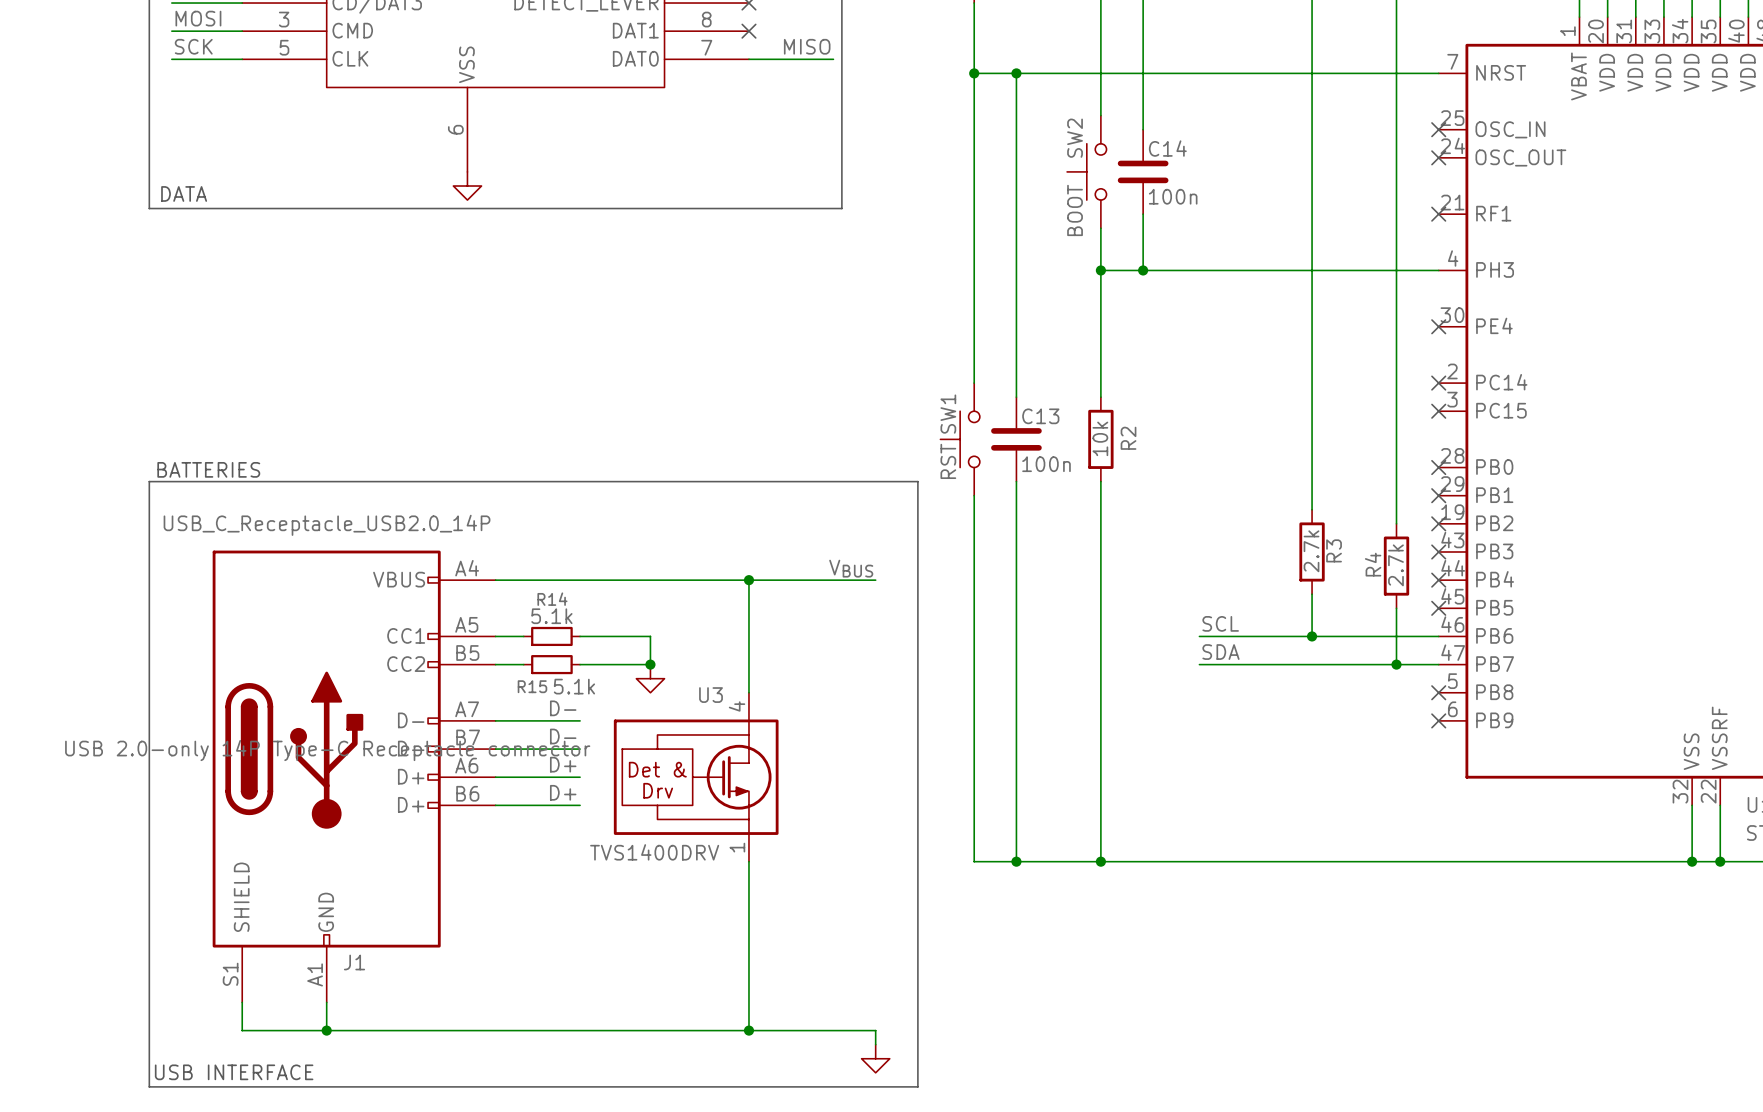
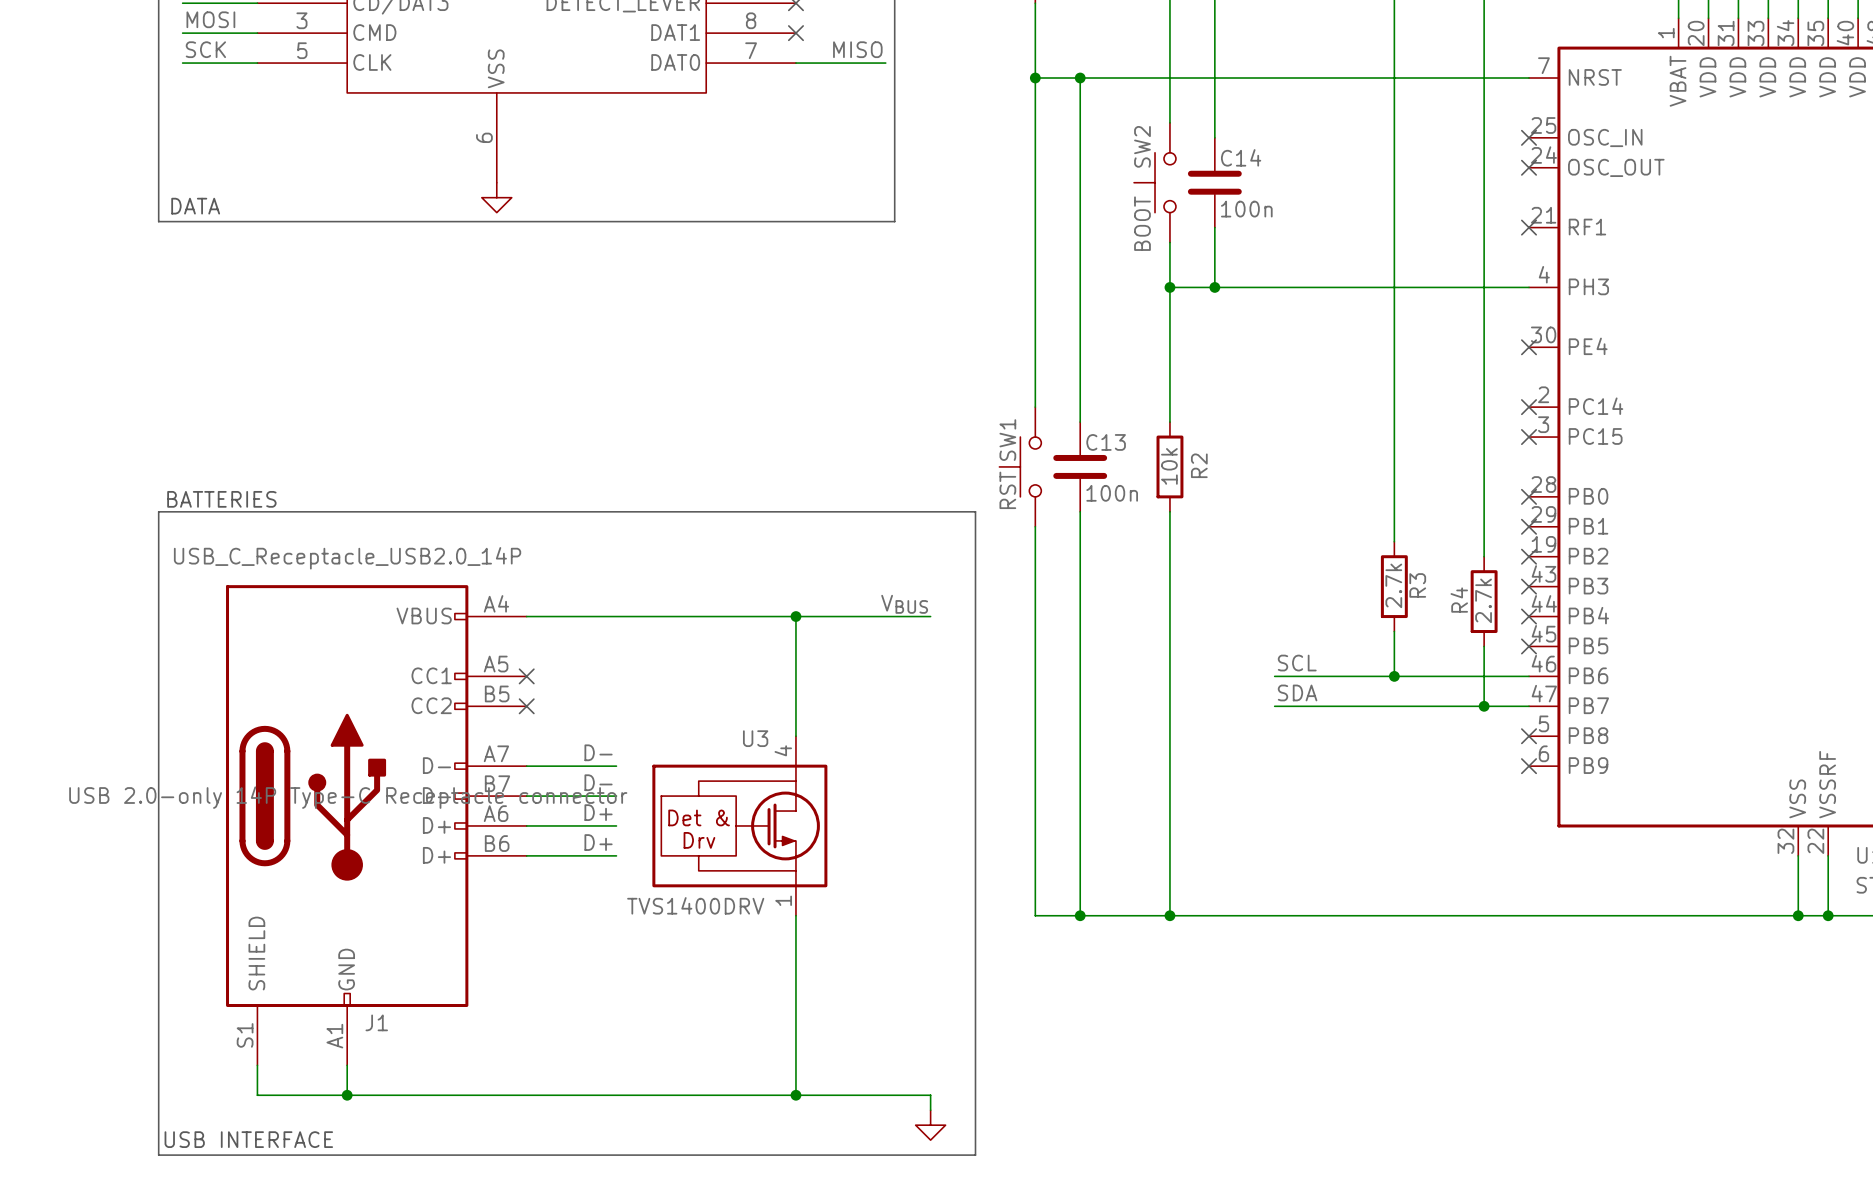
wire: (495, 636) (523, 636) -> none
no-connect mark: none -> (526, 676)
R14: 5.1k (551, 636) -> none
wire: (580, 636) (650, 636) (650, 664) (580, 664) -> none
wire: (495, 664) (523, 664) -> none
no-connect mark: none -> (526, 706)
R15: 5.1k (551, 664) -> none
junction: (650, 664) -> none
power symbol: (650, 678) -> none

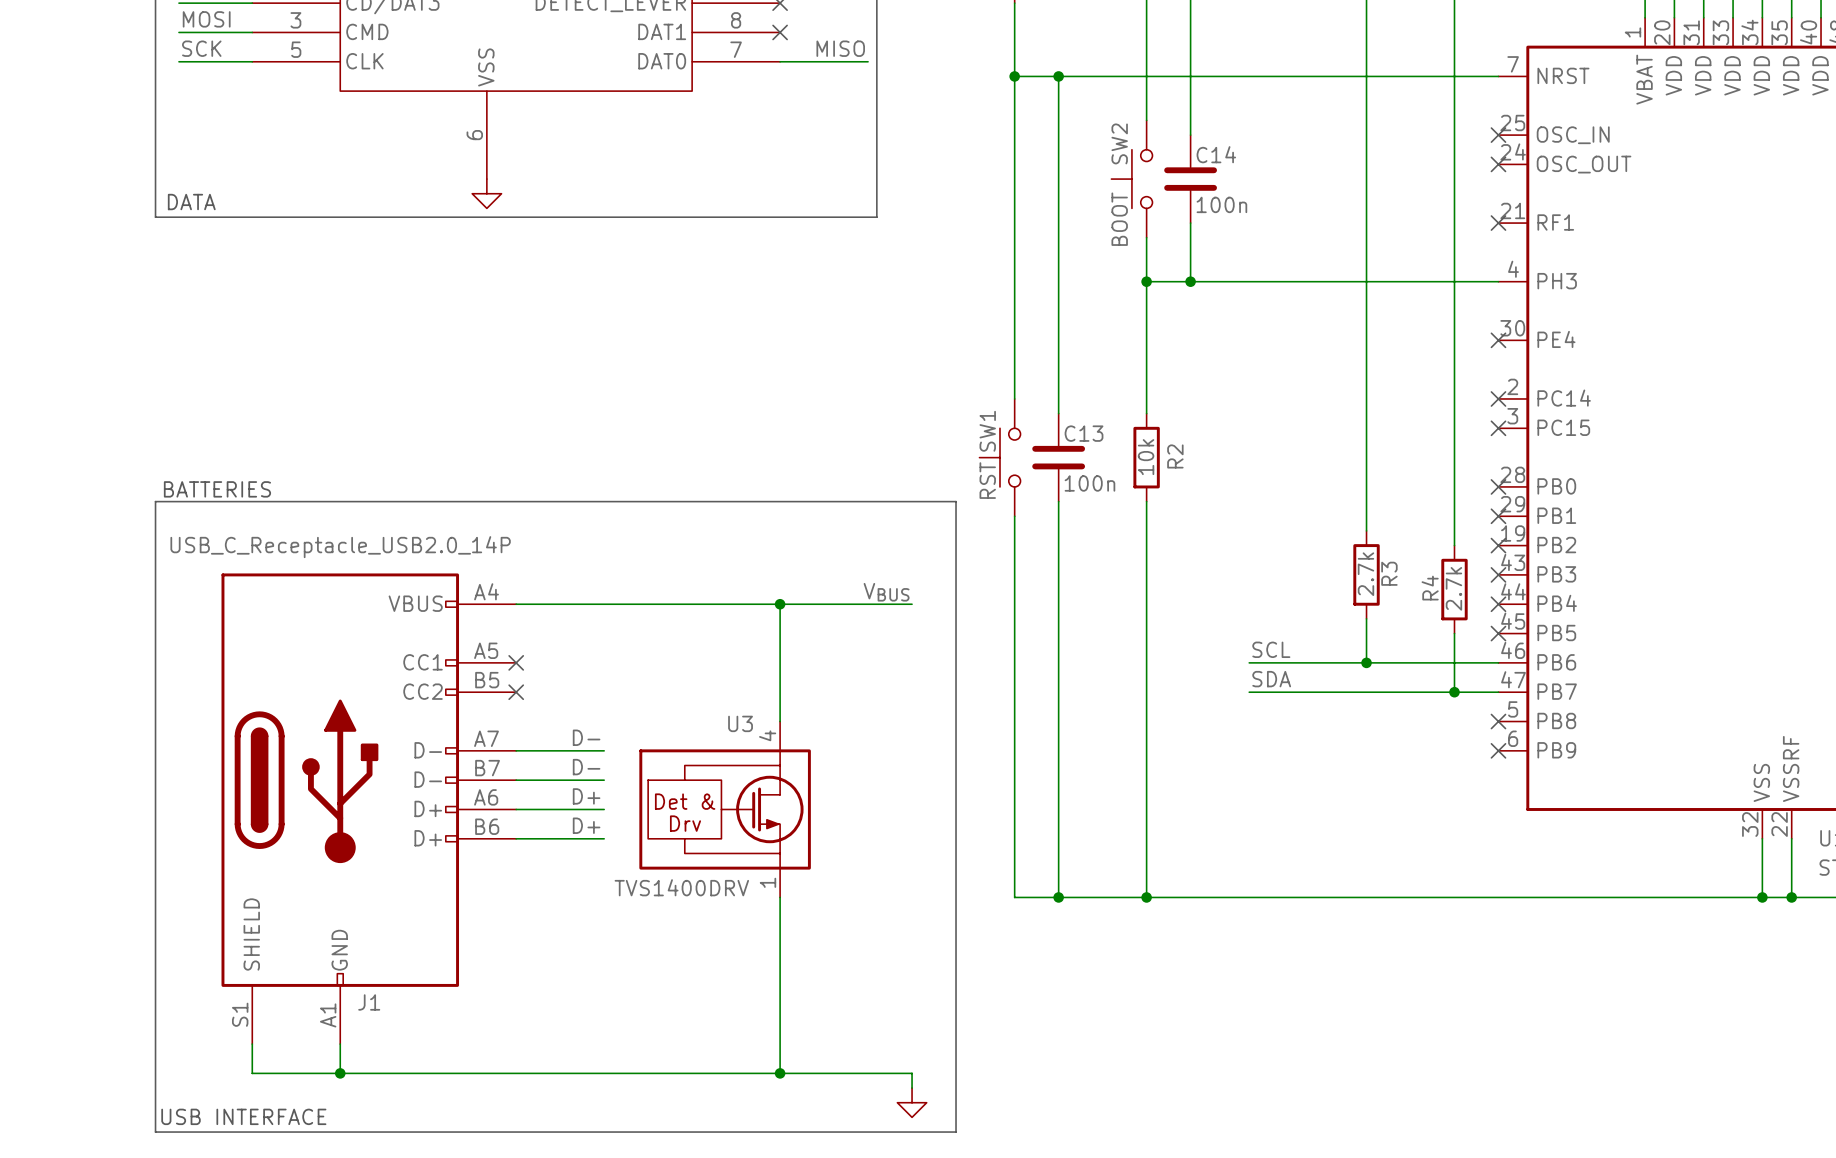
J1 text: USB 2.0-only 14P Type-C Receptacle connector (348, 797) -> none

